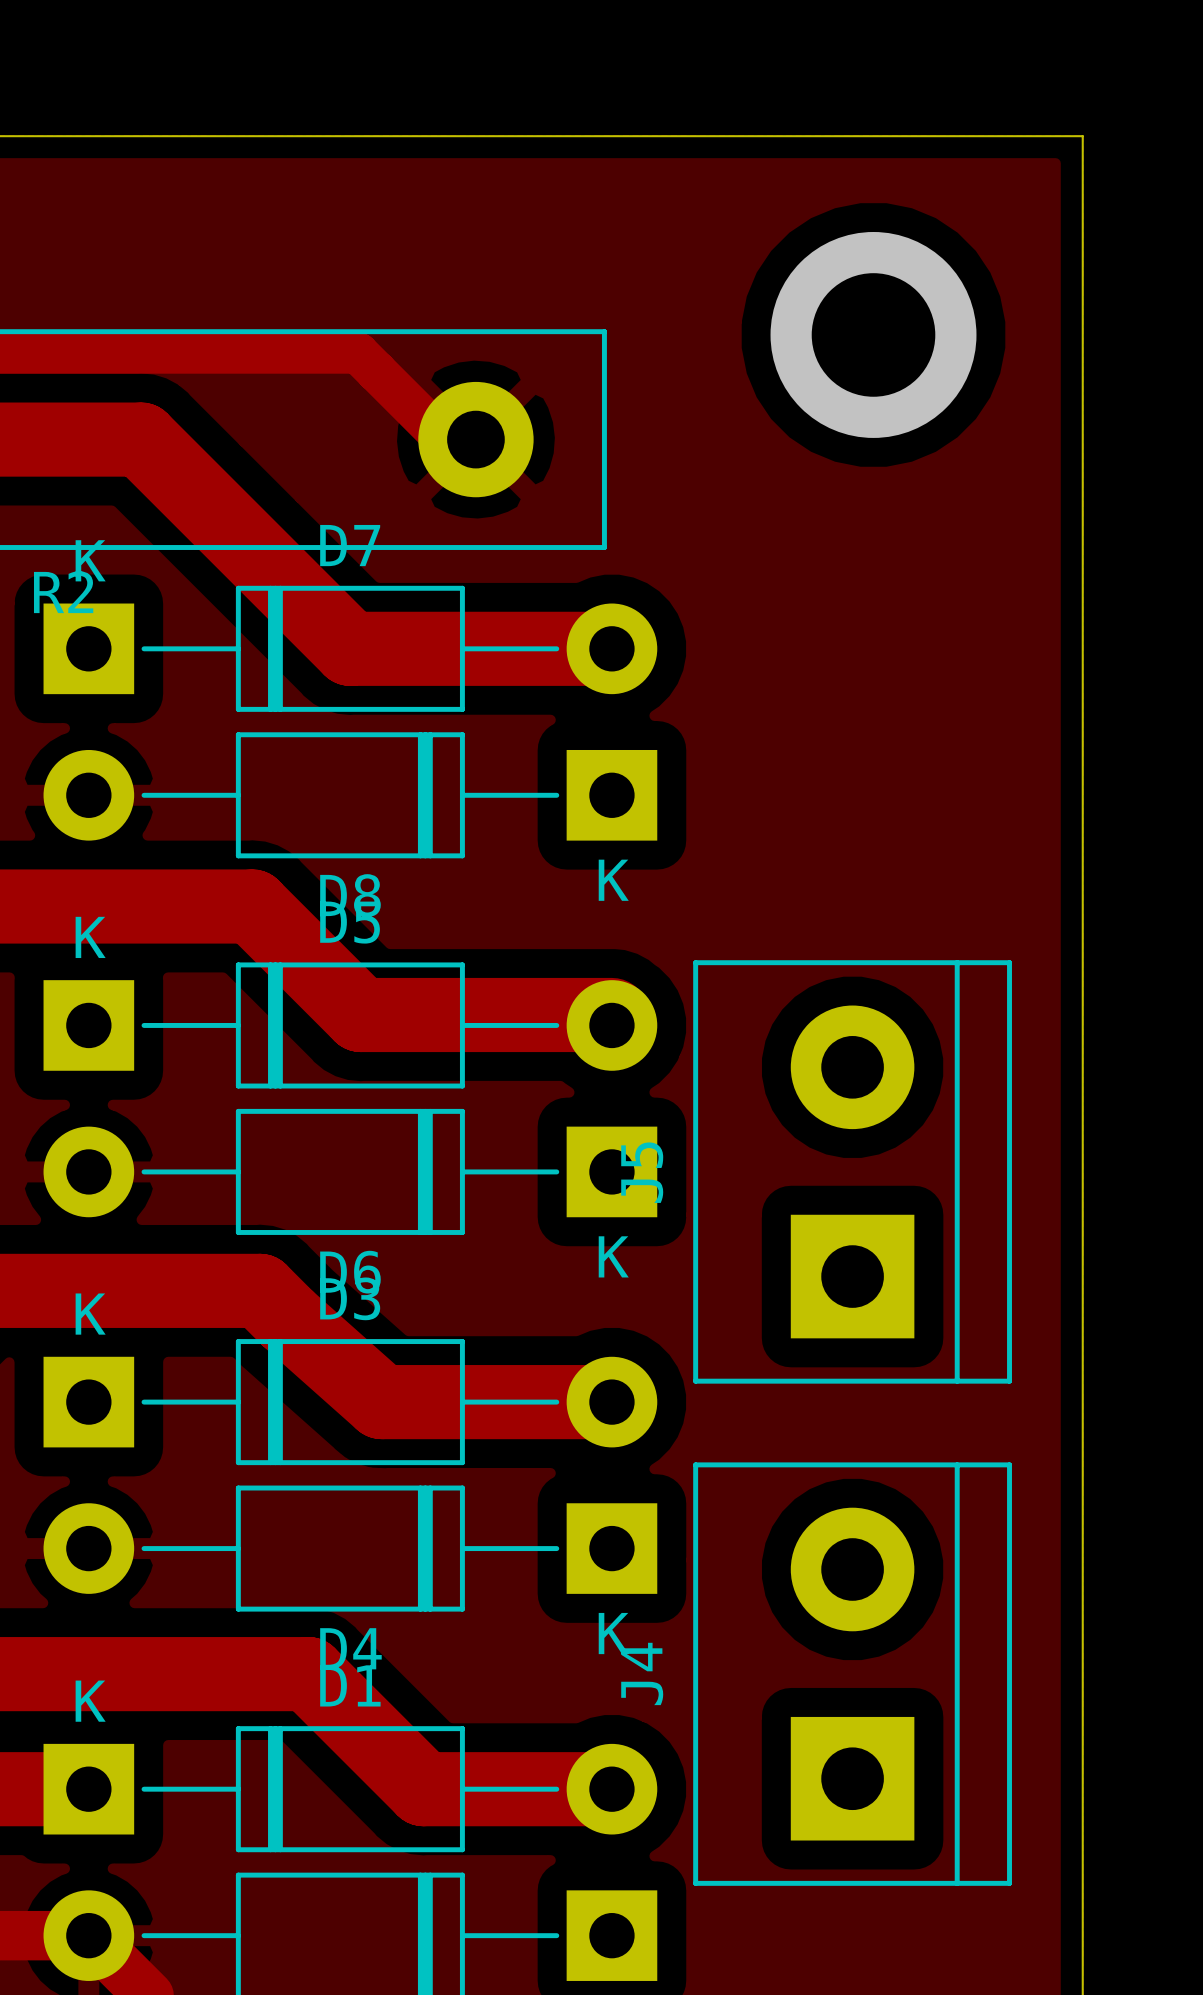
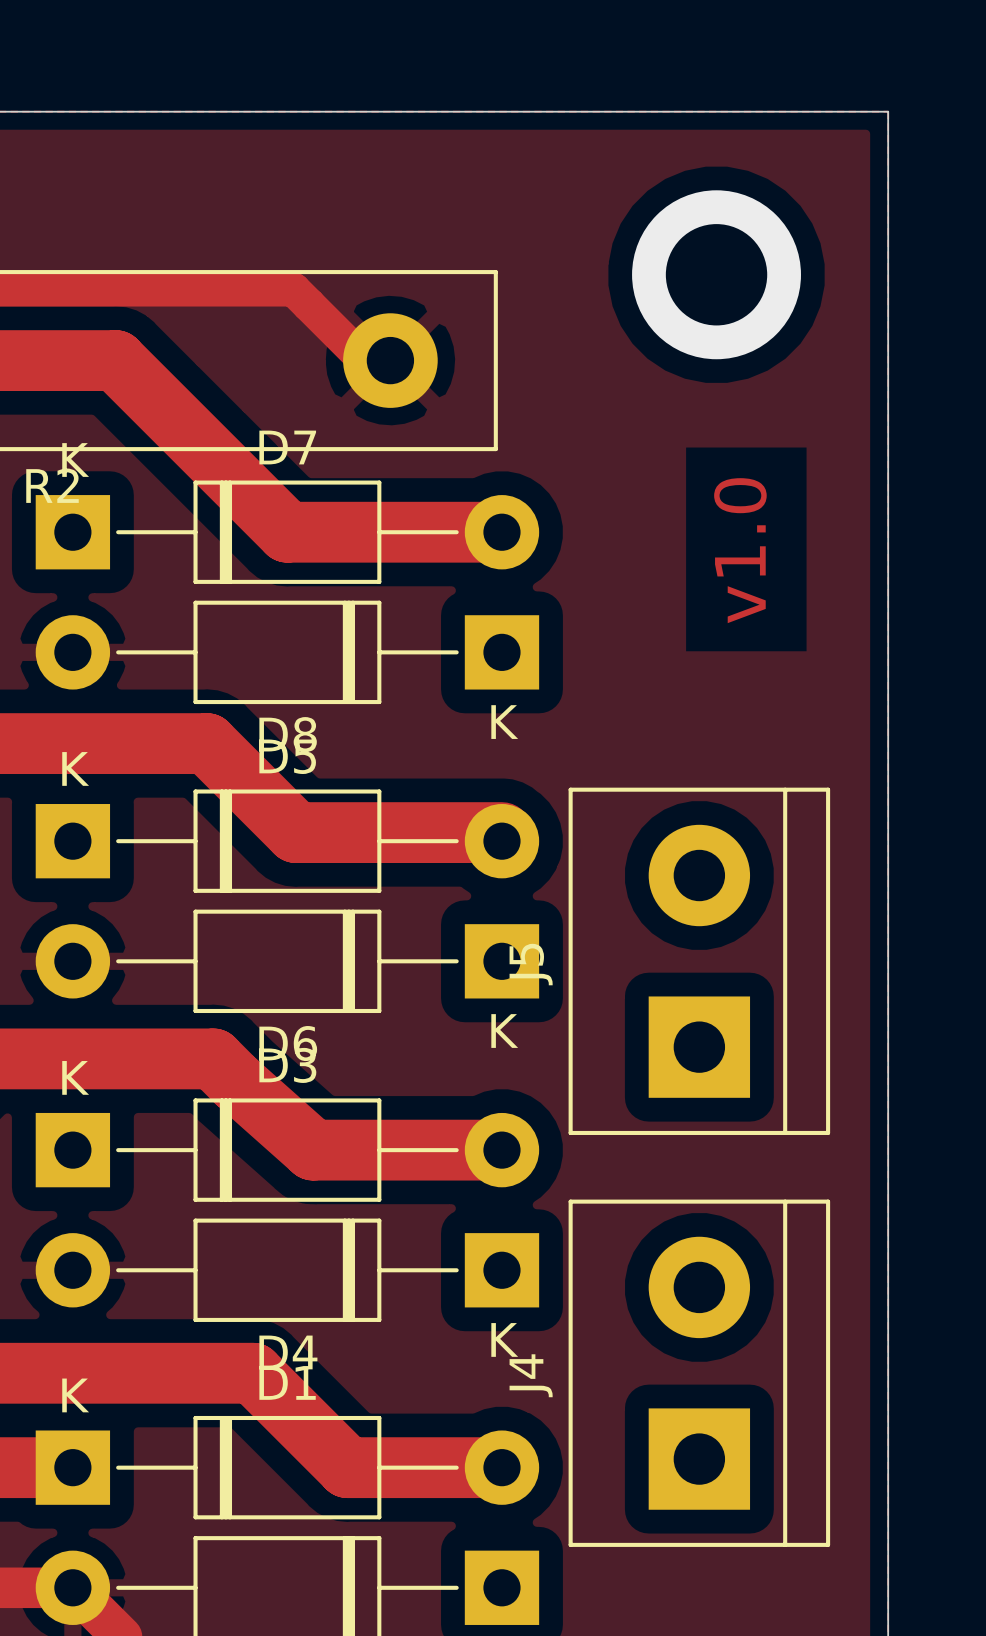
text: none -> v1.0 (740, 550)

